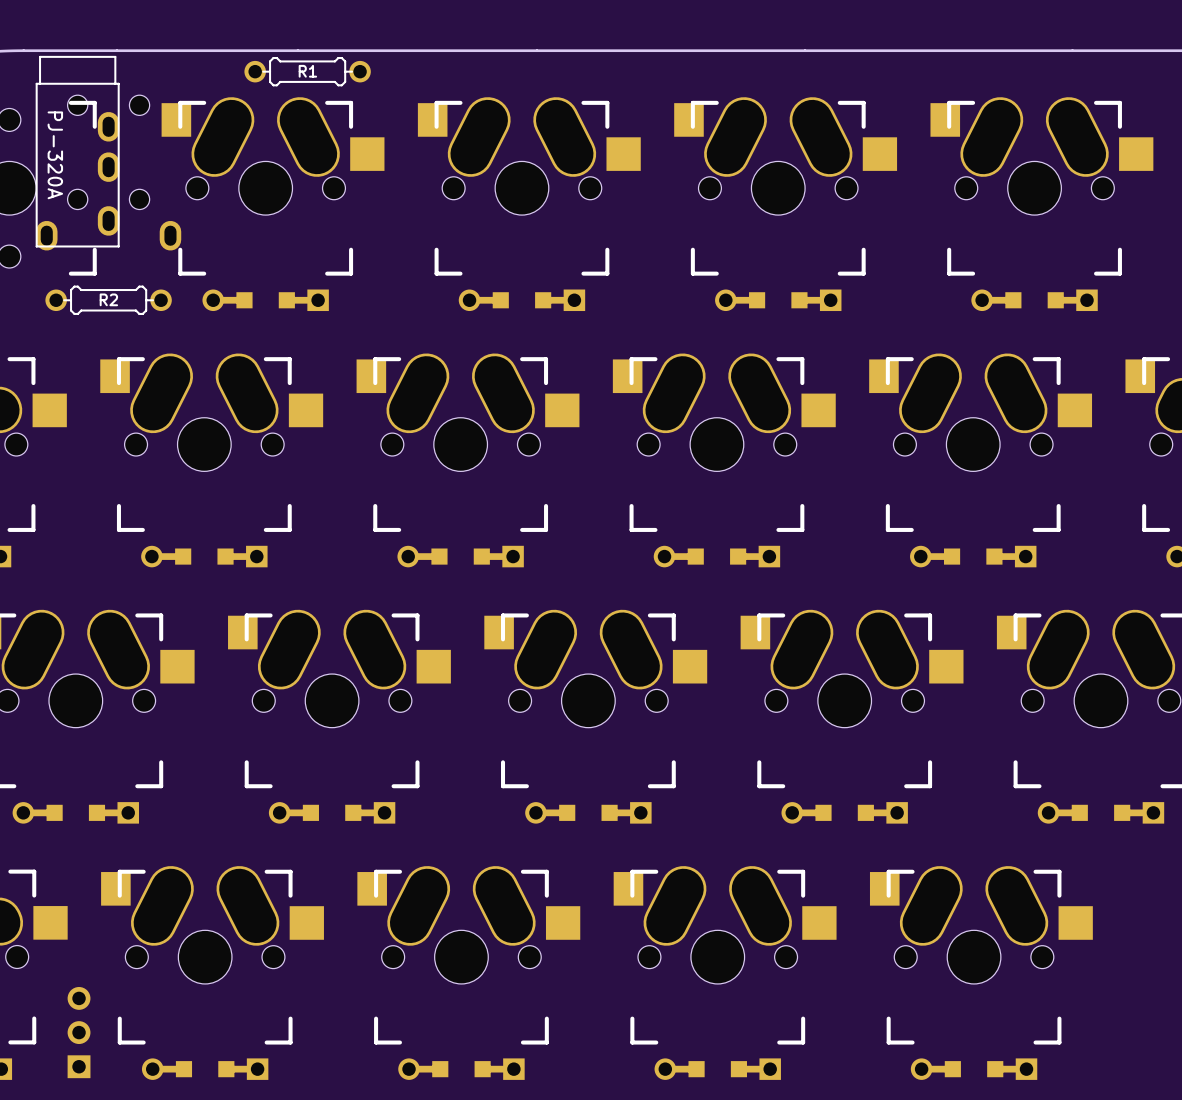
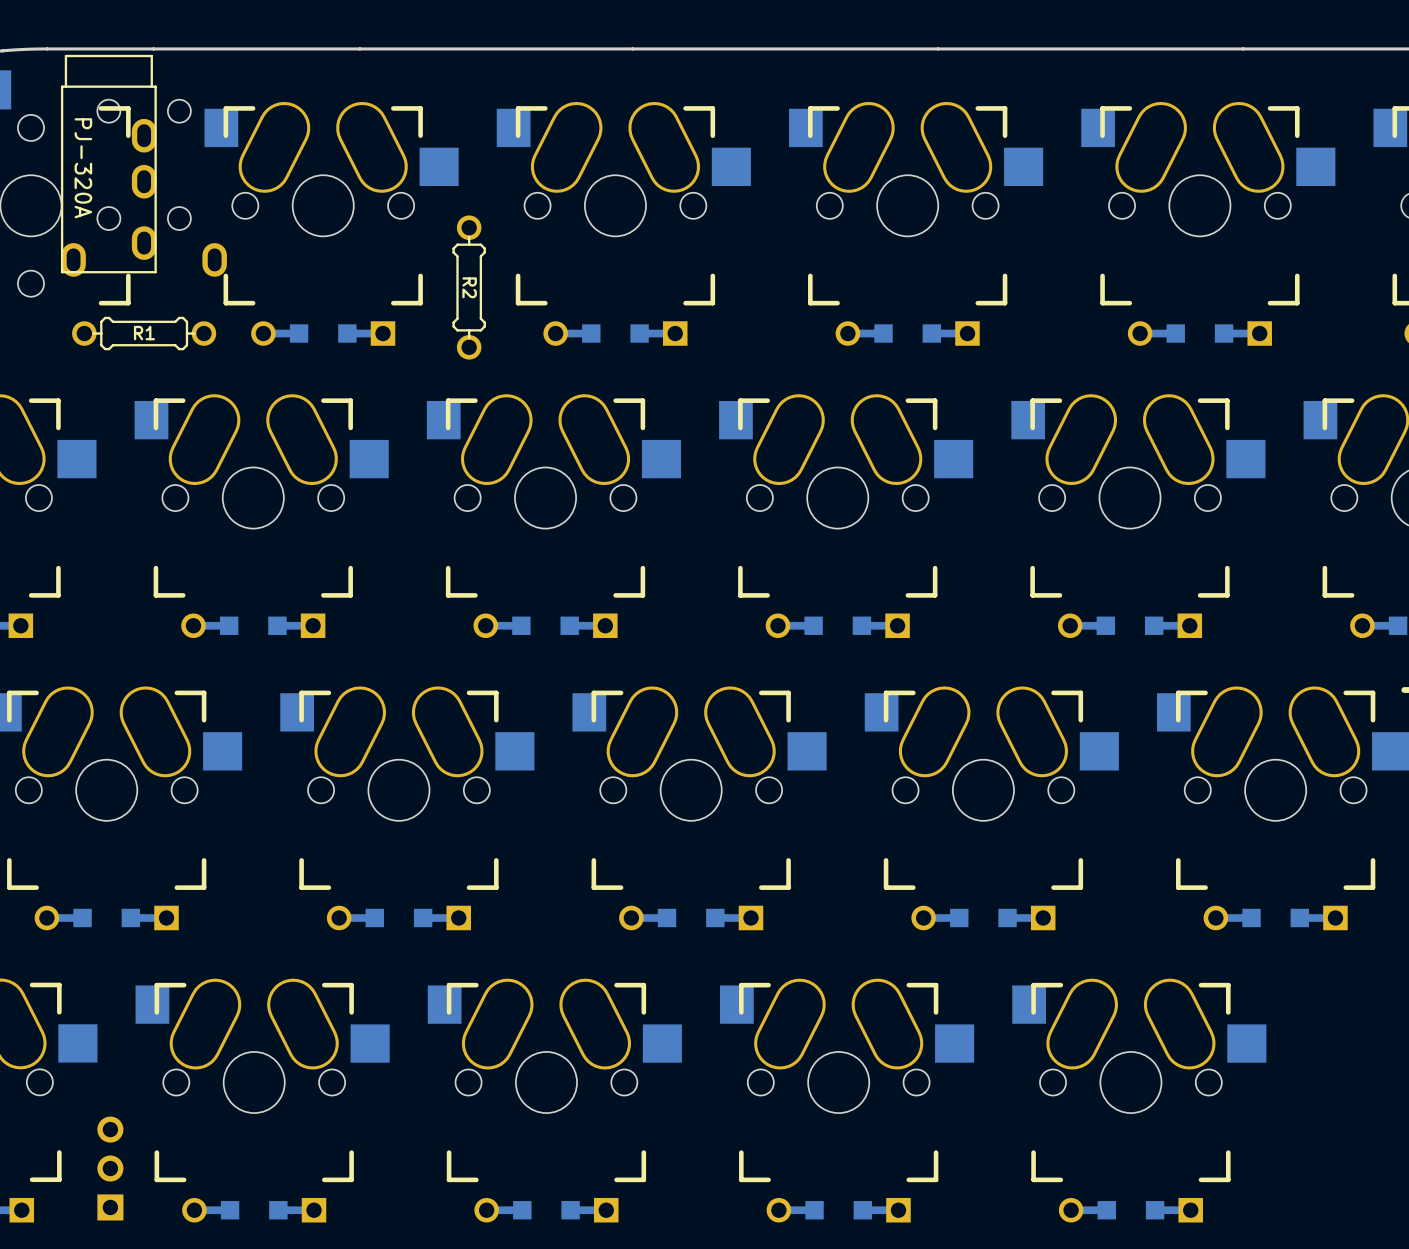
R1: (307, 71) -> none
R2: none -> (469, 287)
R2 name: R2 (108, 299) -> R1 (144, 333)

